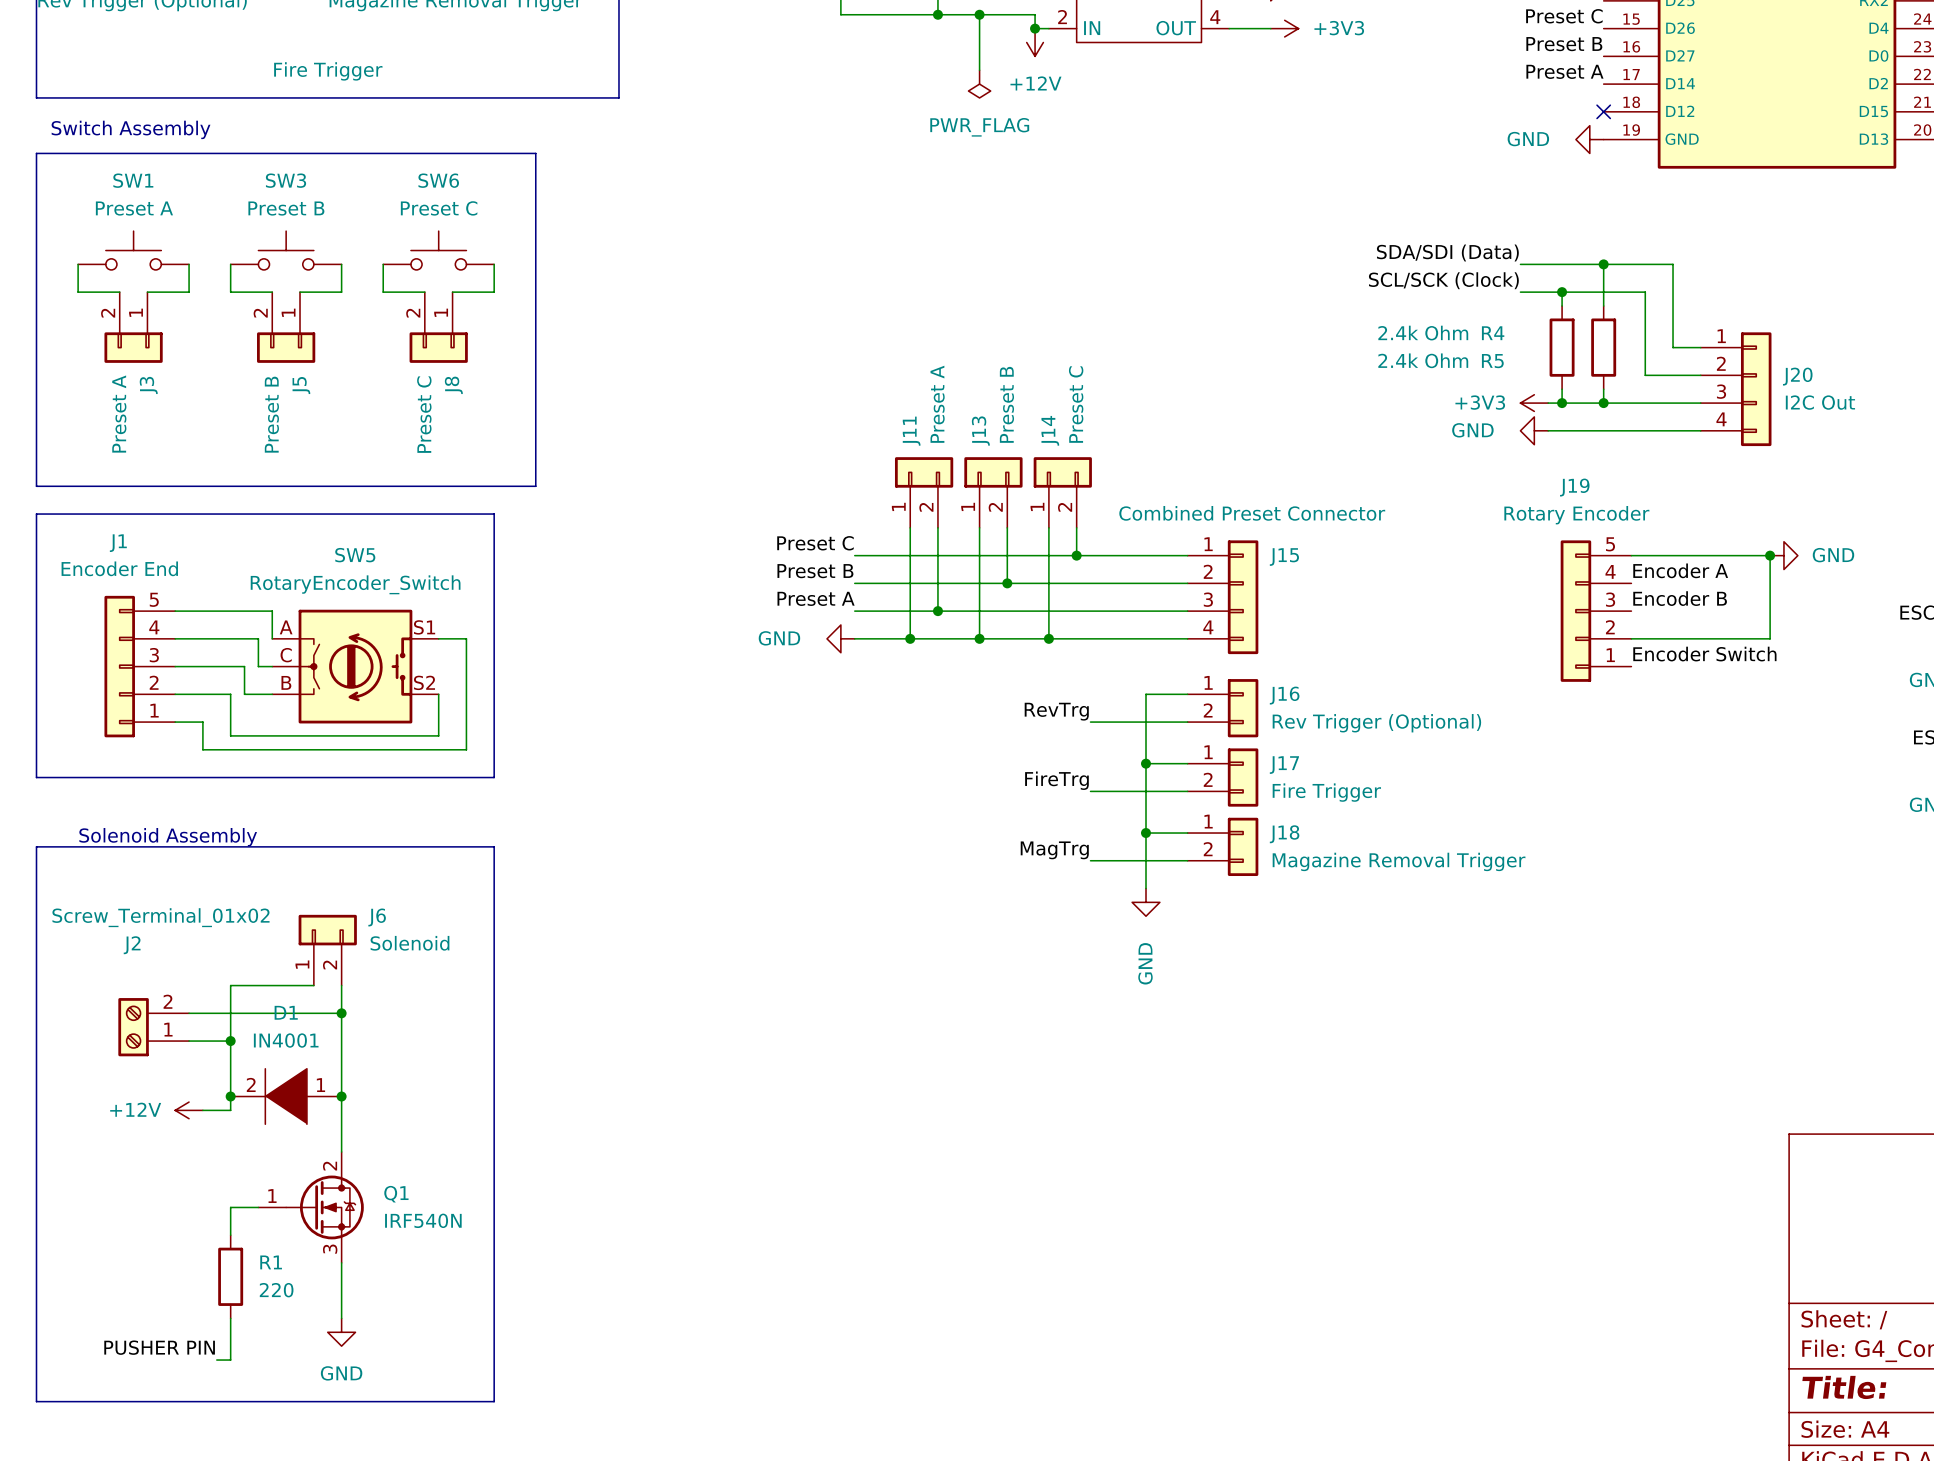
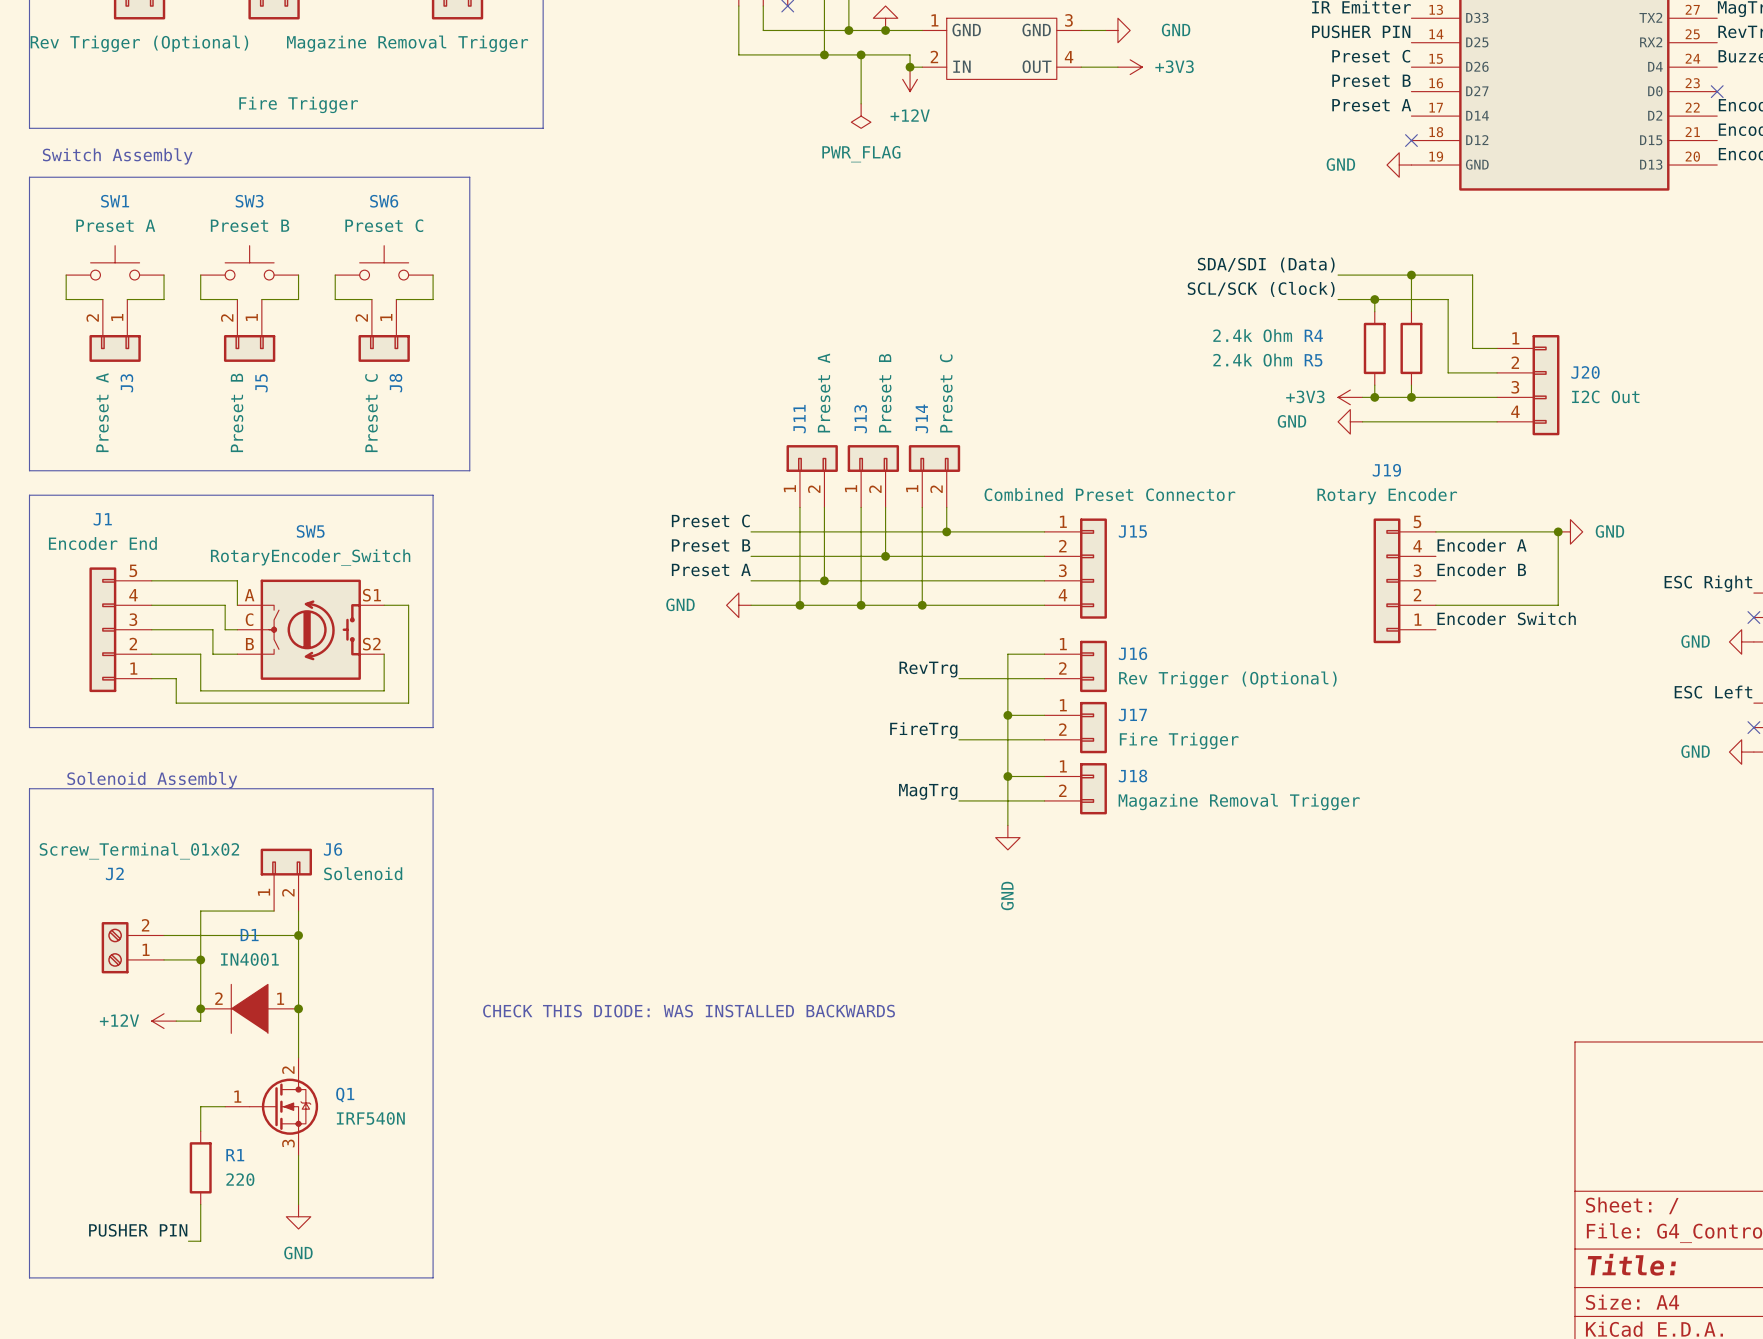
text: none -> CHECK THIS DIODE: WAS INSTALLED BACKWARDS (689, 1011)

